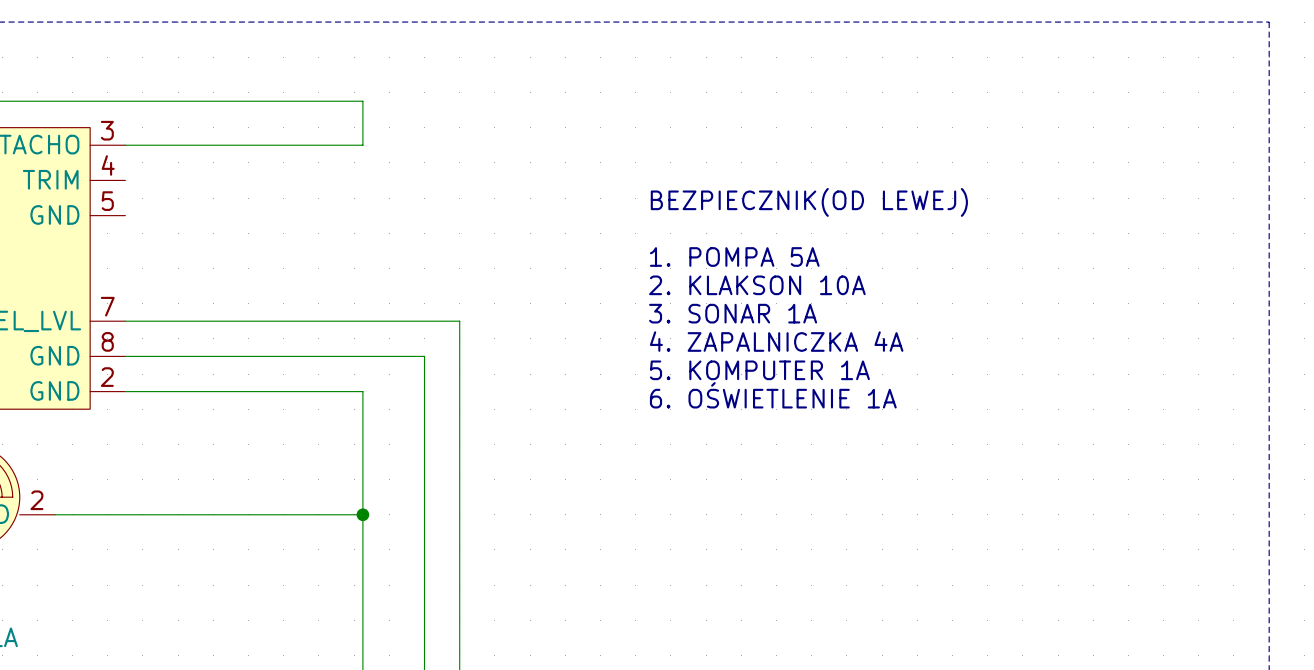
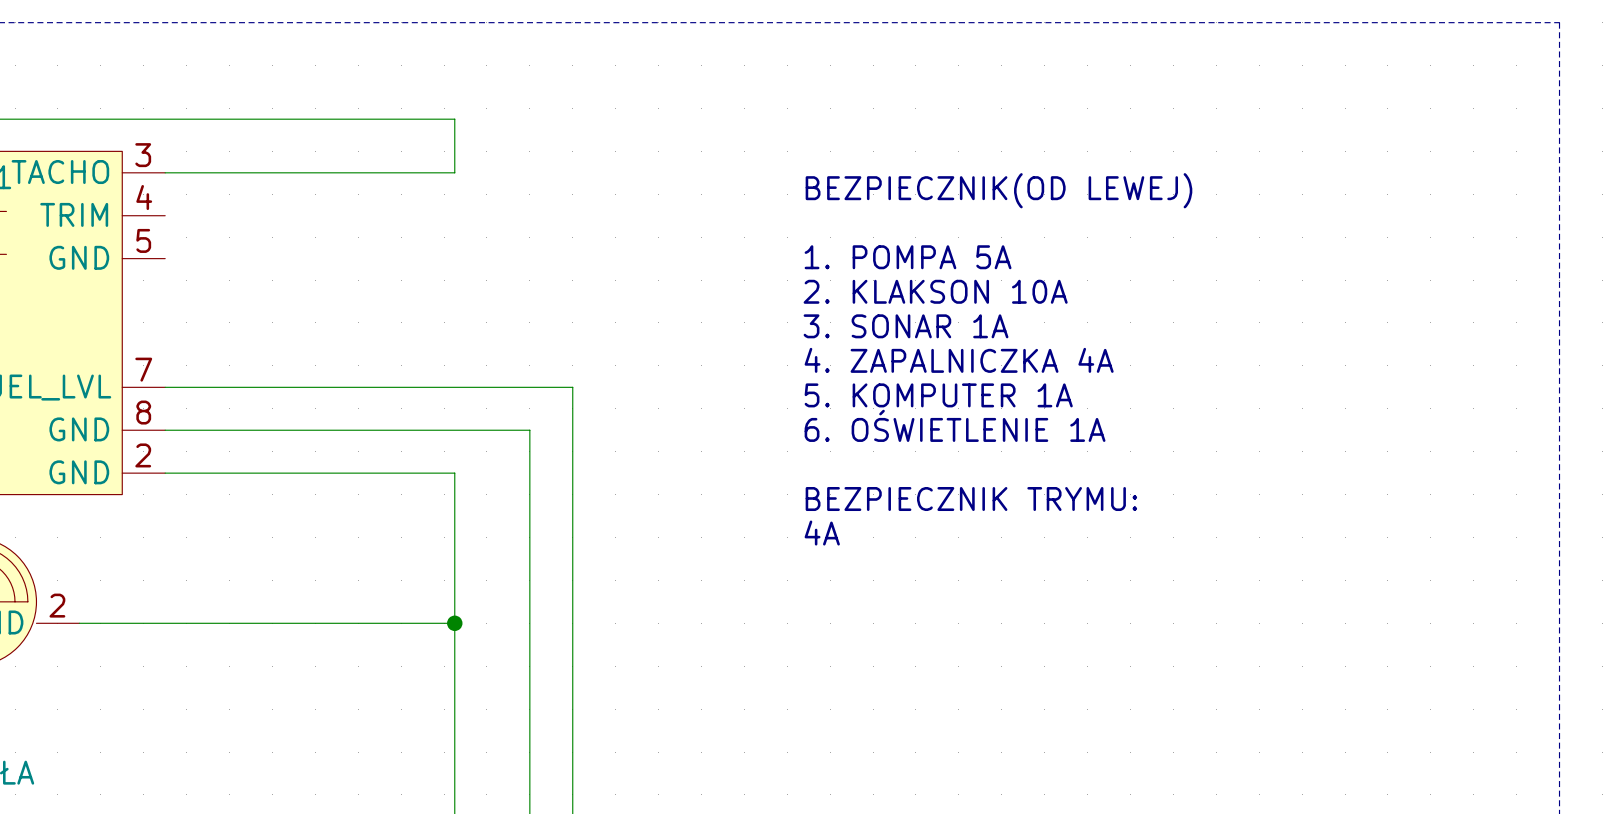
text position: BEZPIECZNIK(OD LEWEJ) (809, 202) -> BEZPIECZNIK(OD LEWEJ) (998, 190)
text position: 1. POMPA 5A (734, 256) -> 1. POMPA 5A (908, 257)
text position: 2. KLAKSON 10A (757, 285) -> 2. KLAKSON 10A (935, 291)
text position: 3. SONAR 1A (733, 313) -> 3. SONAR 1A (906, 326)
text position: 4. ZAPALNICZKA 4A (776, 341) -> 4. ZAPALNICZKA 4A (959, 360)
text position: 5. KOMPUTER 1A (759, 370) -> 5. KOMPUTER 1A (938, 395)
text position: 6. OŚWIETLENIE 1A (773, 395) -> 6. OŚWIETLENIE 1A (955, 425)
text: none -> BEZPIECZNIK TRYMU: (971, 499)
text: none -> 4A (822, 533)

